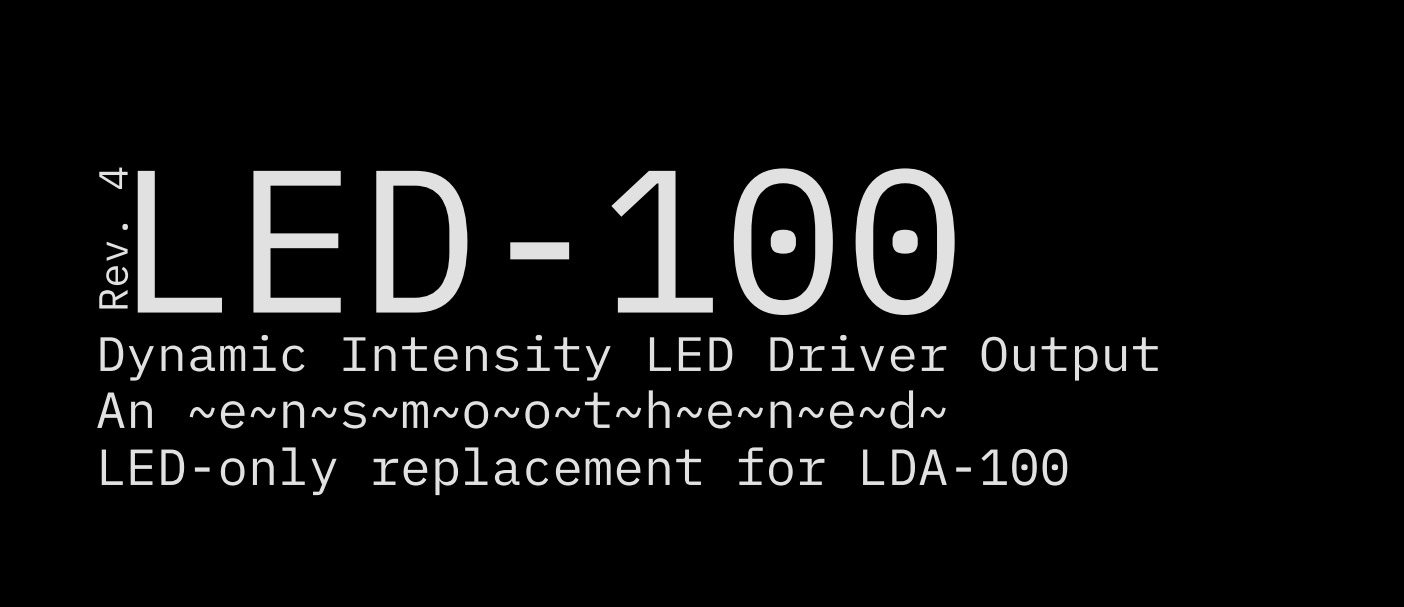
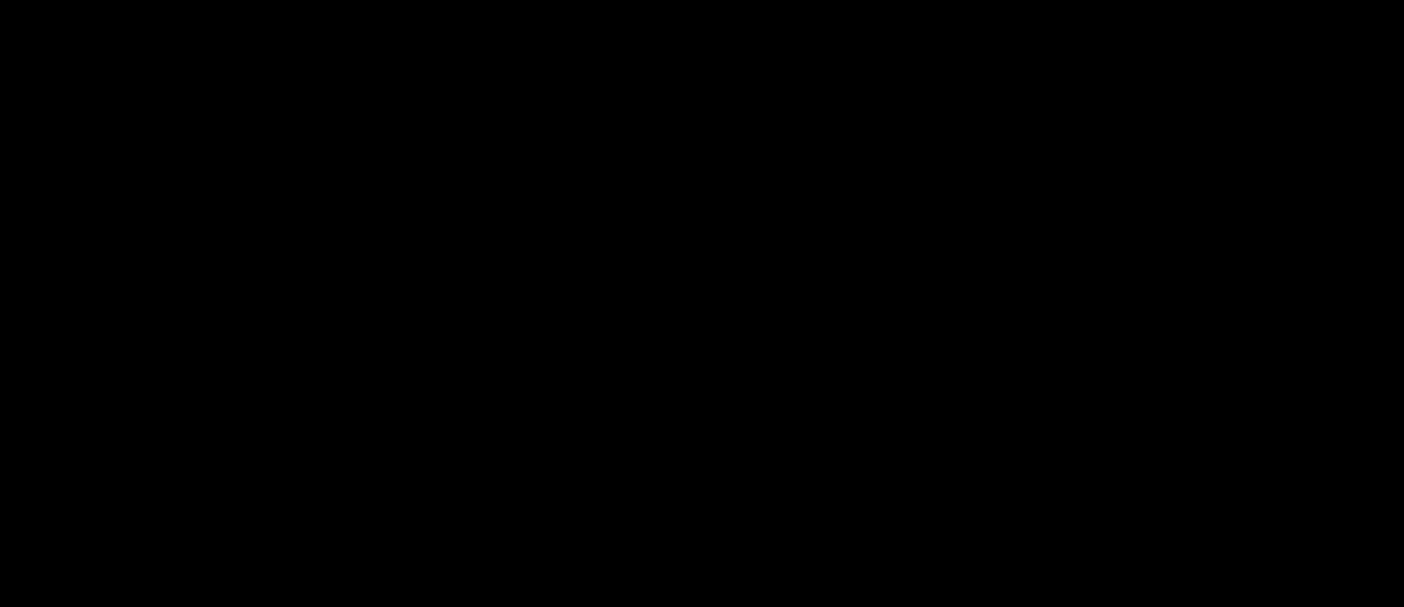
text: Rev. 4 (113, 238) -> none
text: LED-100 (546, 241) -> none
text: Dynamic Intensity LED Driver Output (629, 357) -> none
text: An ~e~n~s~m~o~o~t~h~e~n~e~d~ (521, 409) -> none
text: LED-only replacement for LDA-100 (584, 471) -> none

